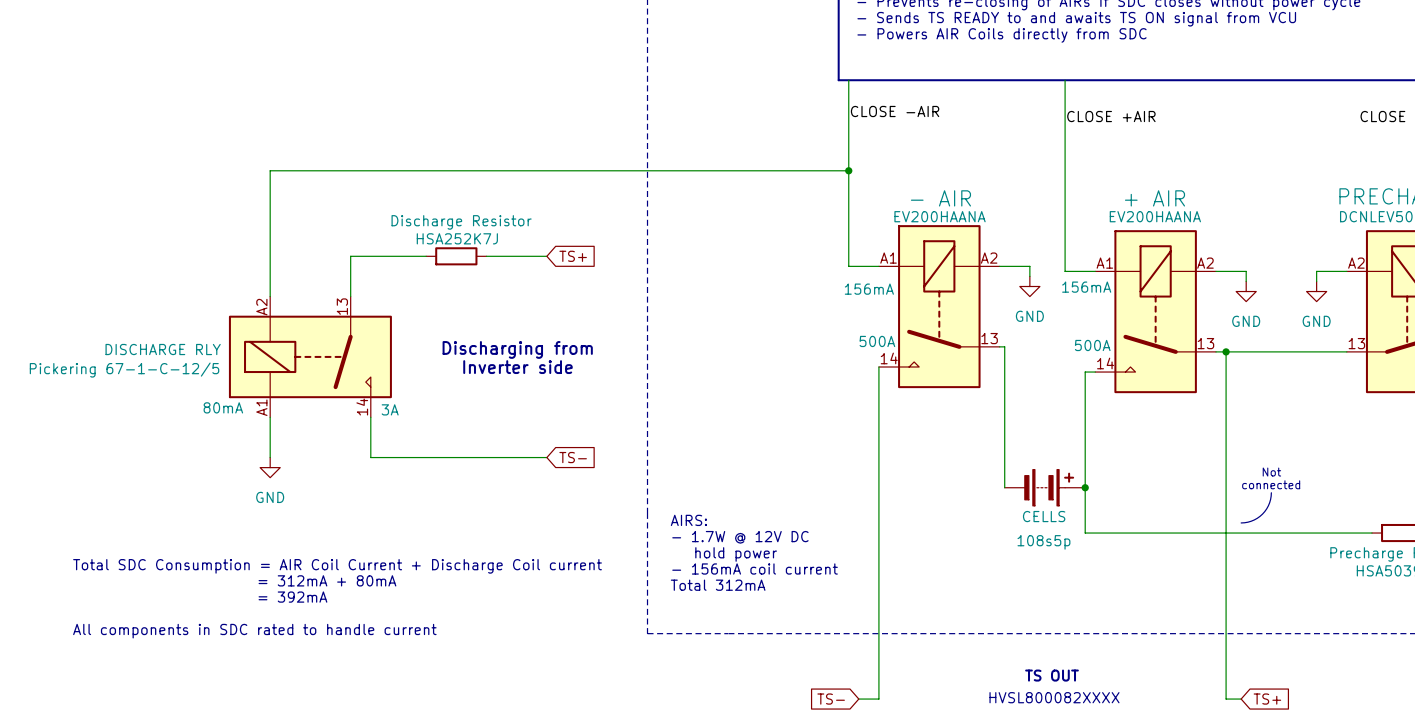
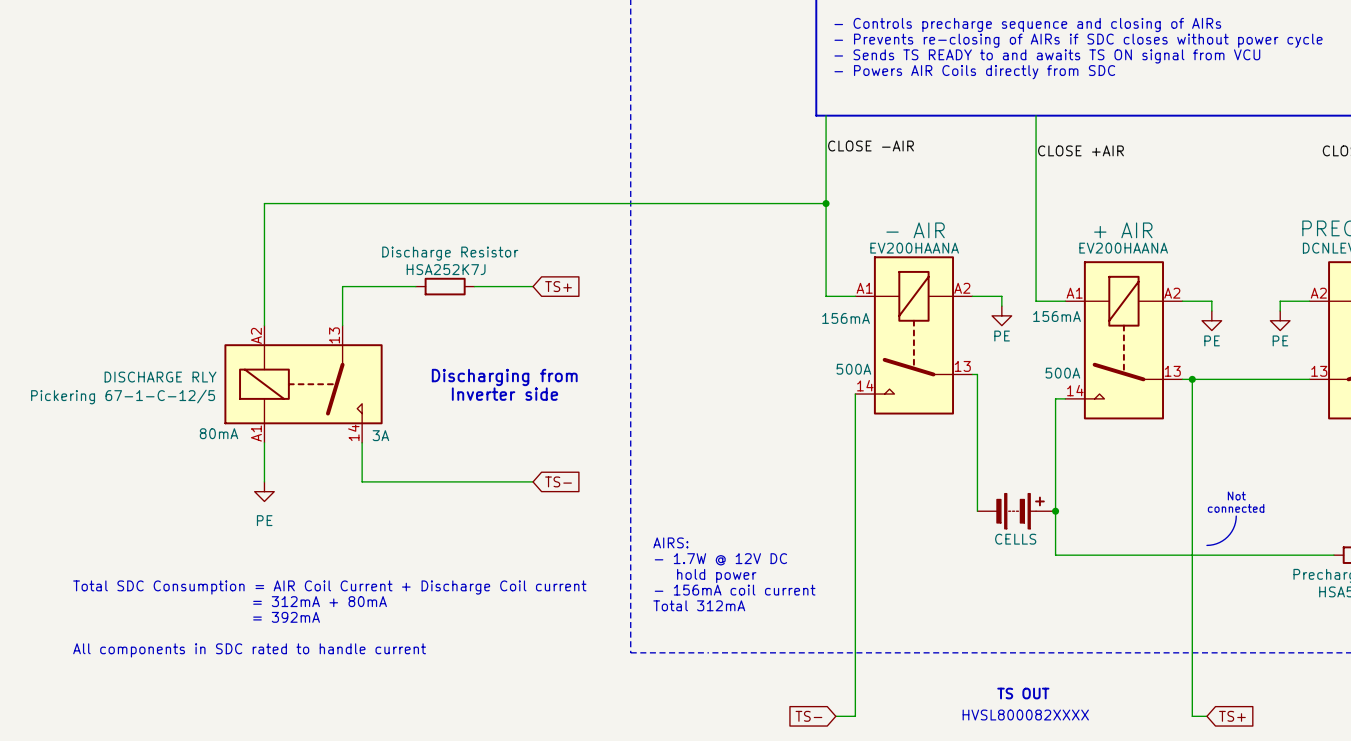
power symbol: GND (1029, 286) -> PE (1001, 315)
power symbol: GND (1246, 291) -> PE (1211, 320)
power symbol: GND (1316, 291) -> PE (1280, 320)
power symbol: GND (270, 467) -> PE (264, 491)
part text: 108s5p (1043, 542) -> none

